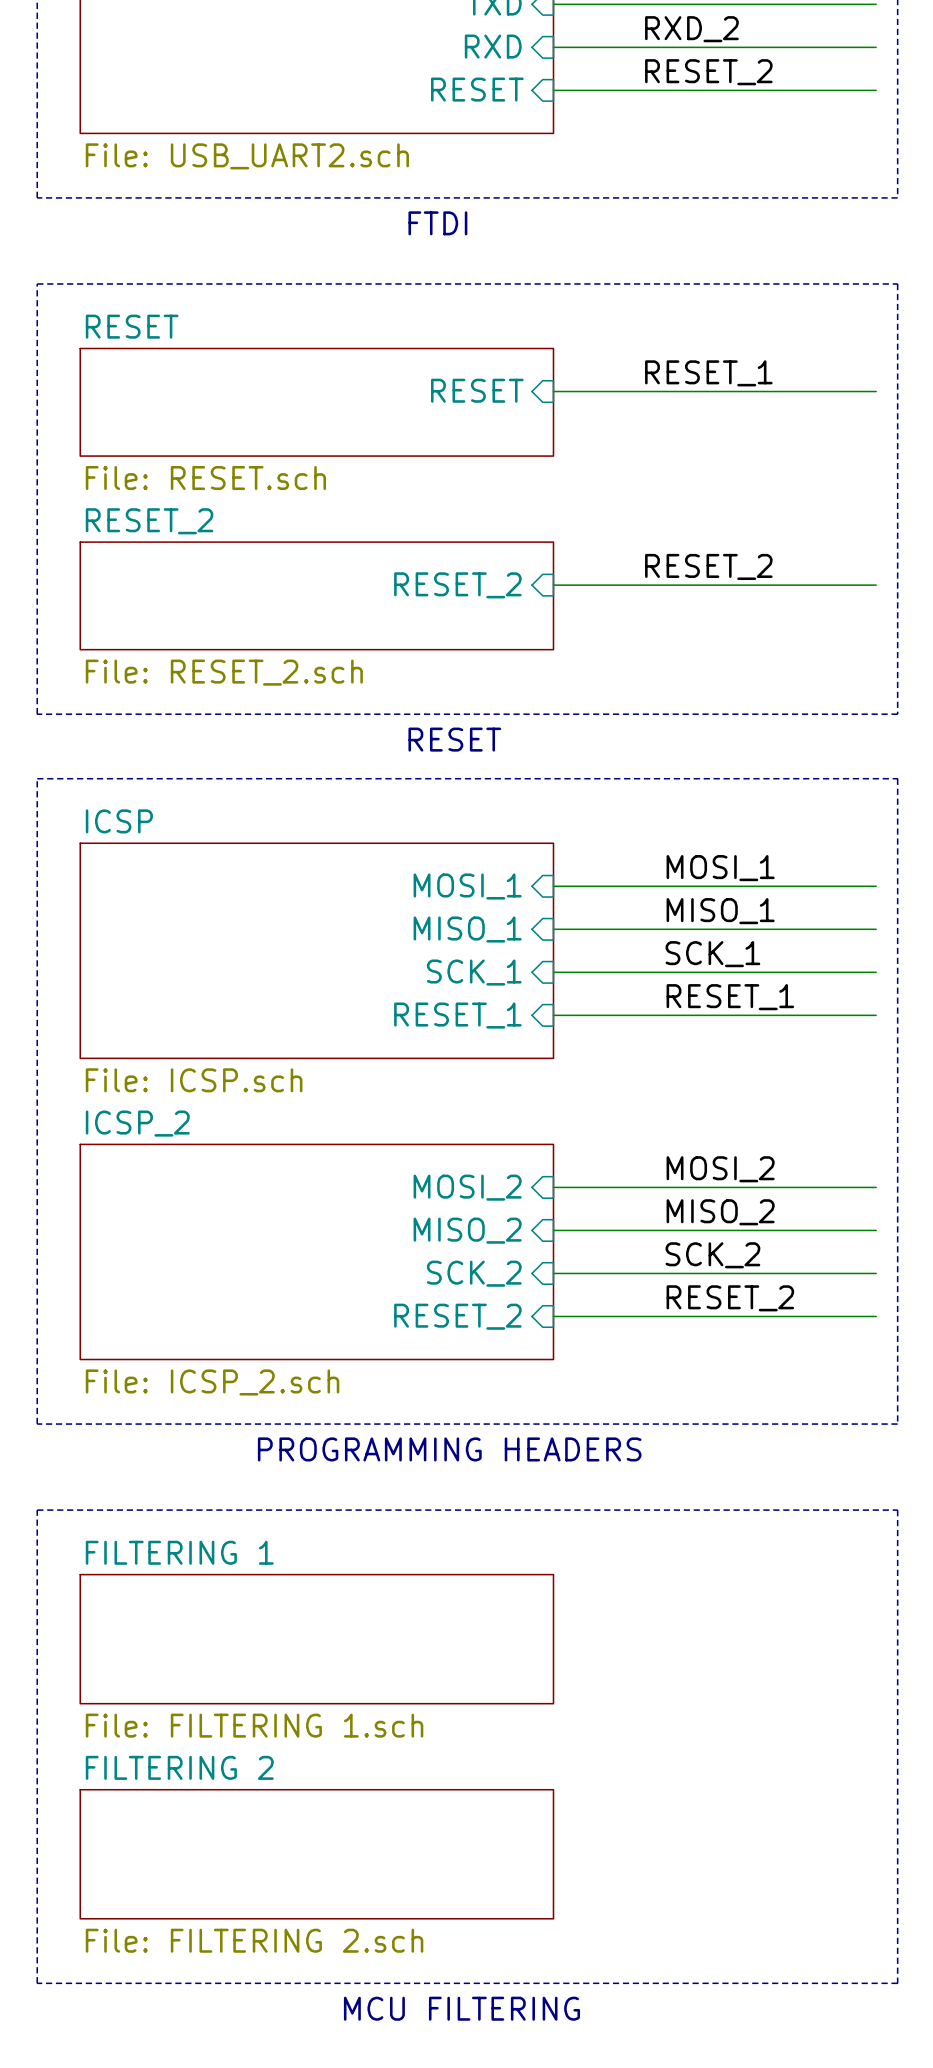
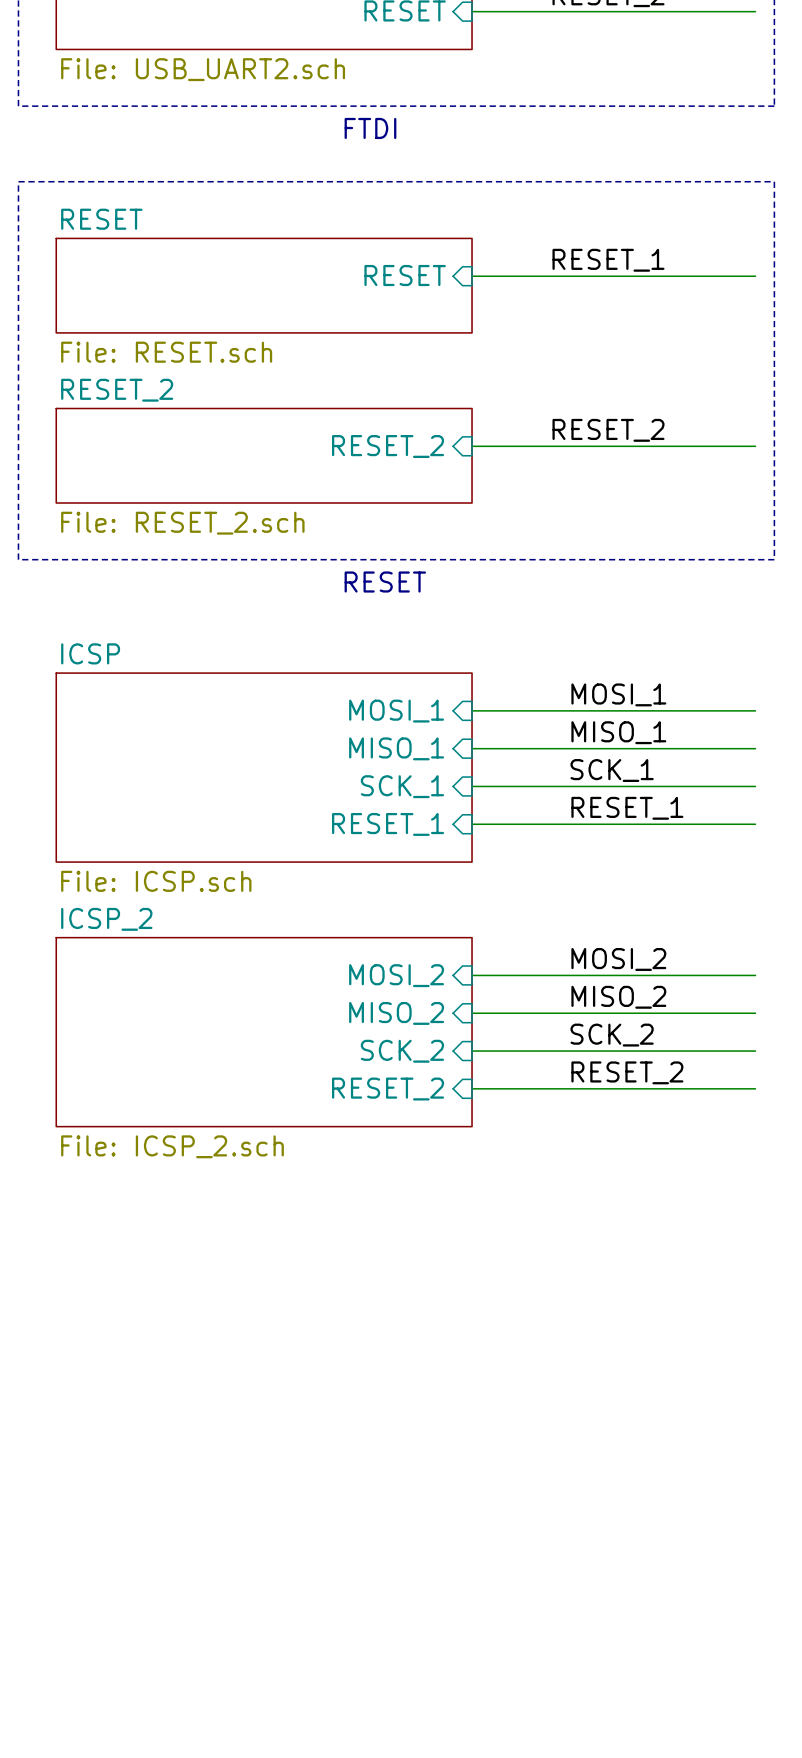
line: (37, 778) (897, 778) (897, 1424) (37, 1424) (37, 778) -> none
text: PROGRAMMING HEADERS (449, 1449) -> none
line: (37, 1510) (37, 1983) (897, 1983) (897, 1510) (37, 1510) -> none
sheet FILTERING 1: File: FILTERING 1.sch (316, 1639) -> none
sheet FILTERING 2: File: FILTERING 2.sch (316, 1854) -> none
text: MCU FILTERING (461, 2008) -> none

